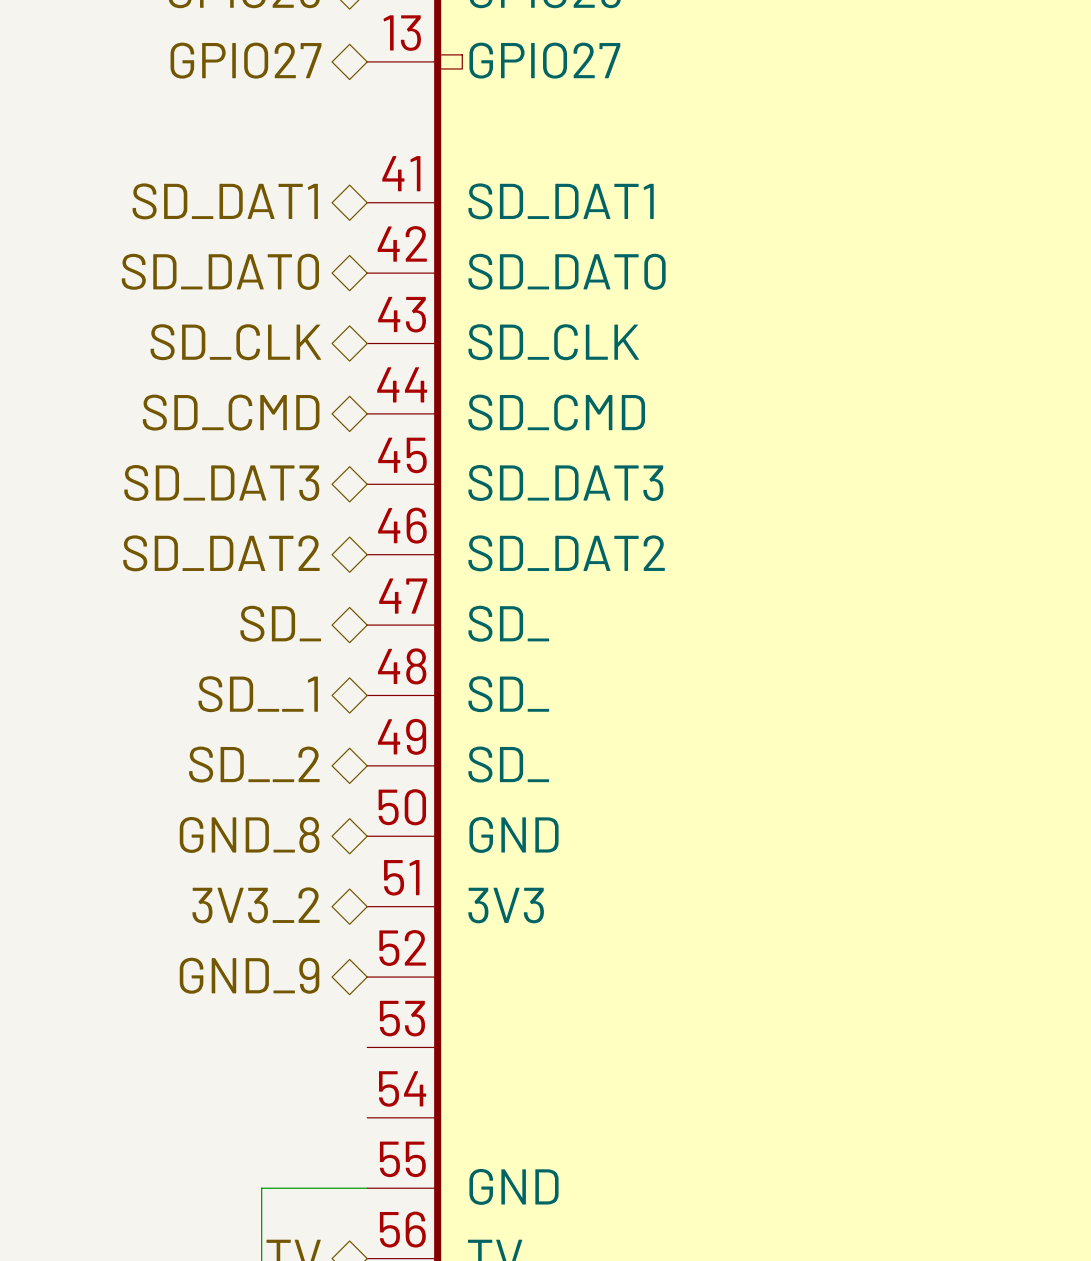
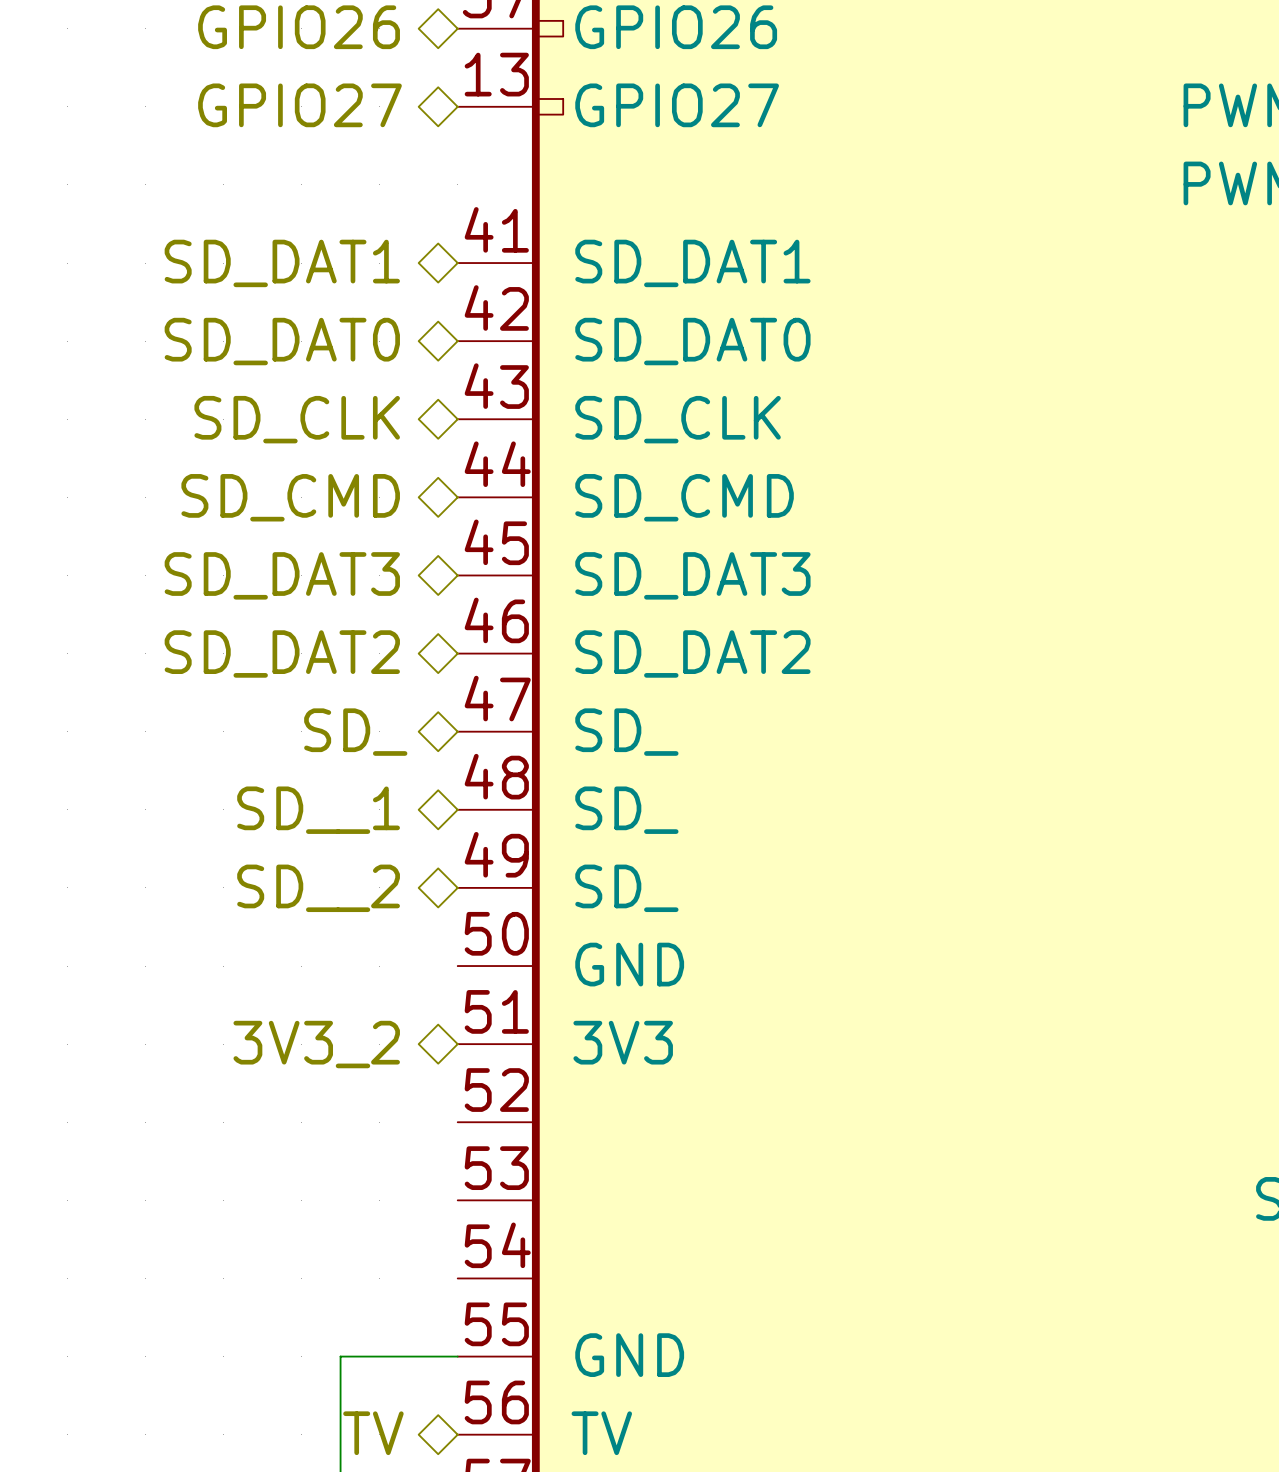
hierarchical label: GND_8 (249, 834) -> none
hierarchical label: GND_9 (249, 975) -> none

